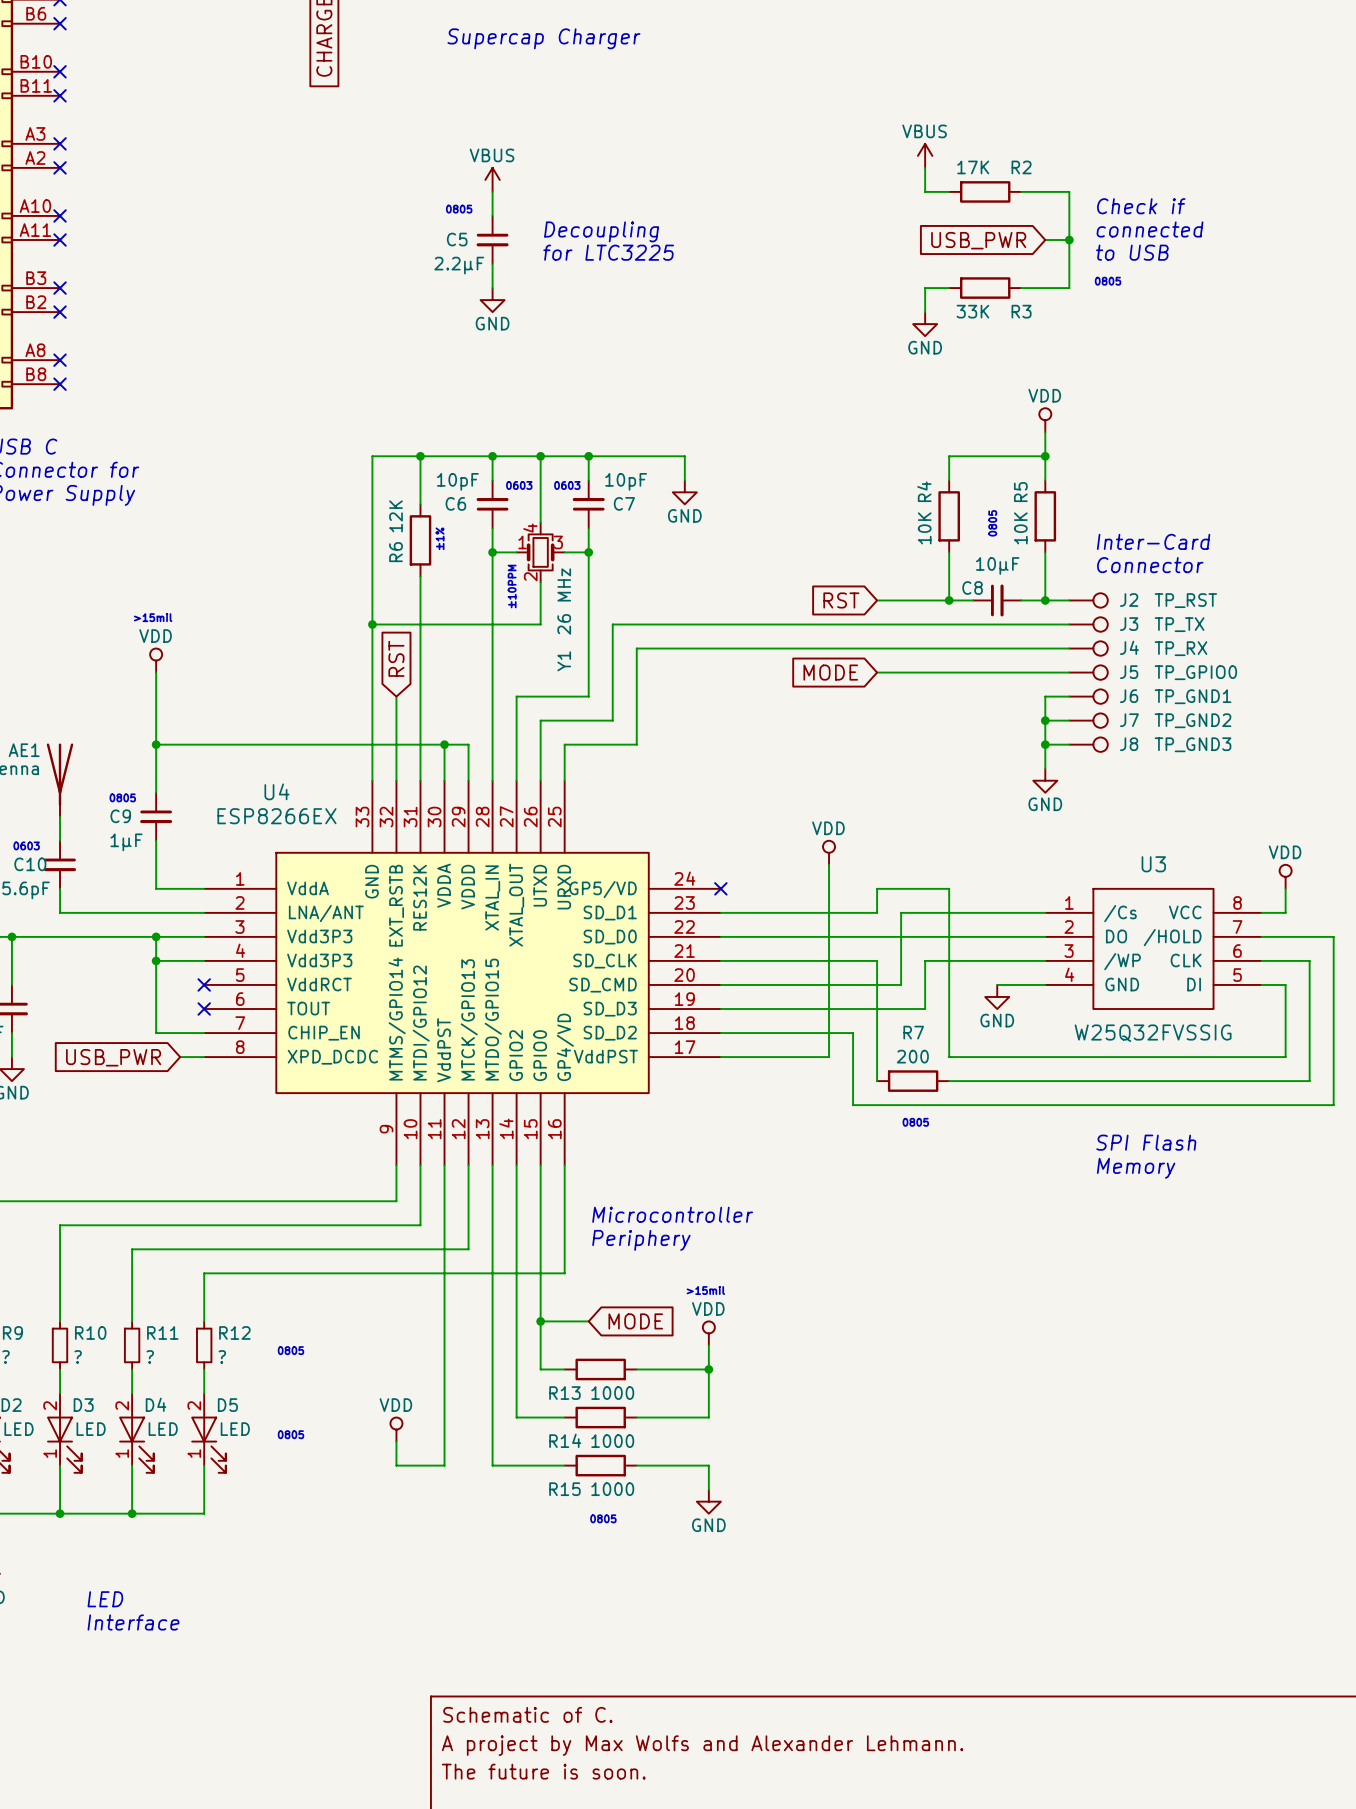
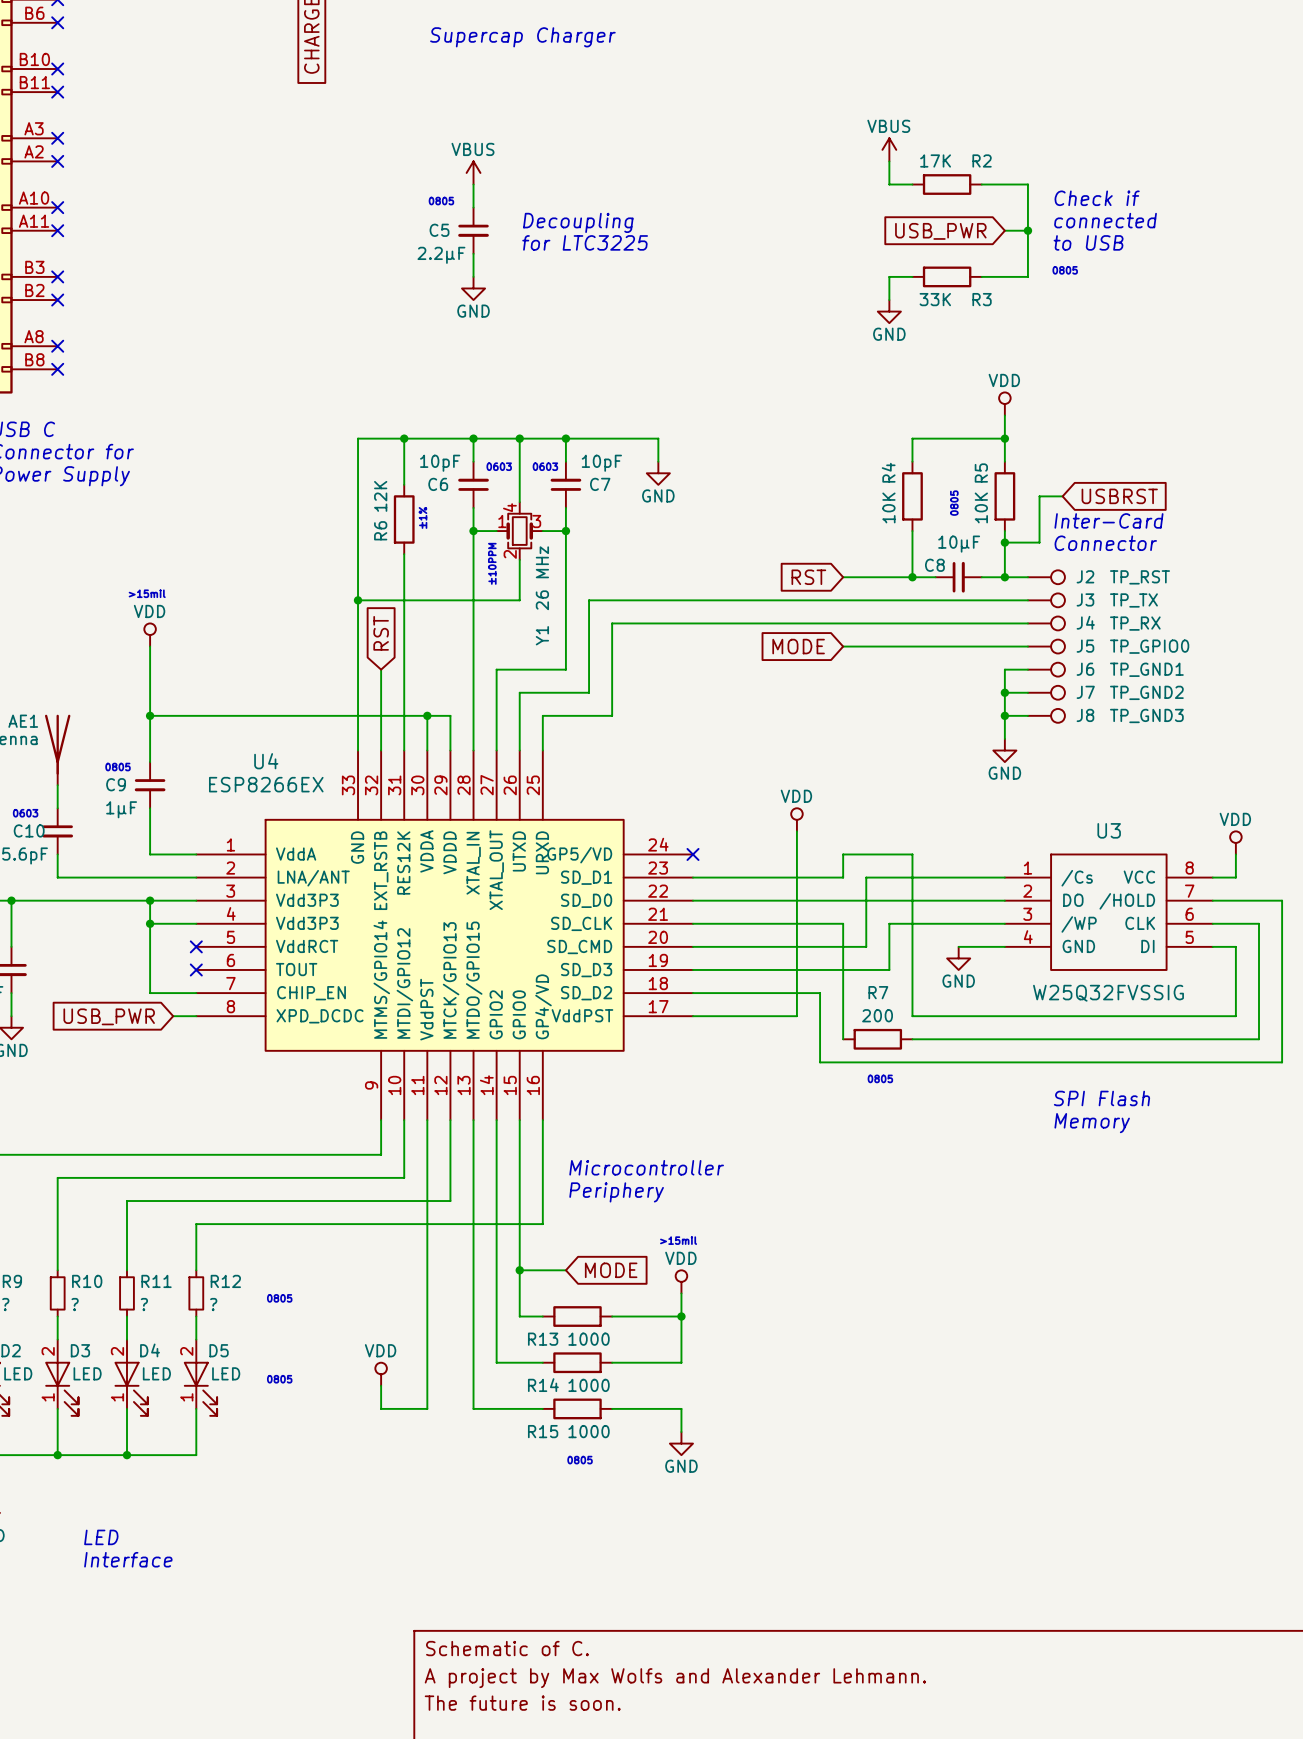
wire: none -> (1062, 496) (1039, 496) (1039, 542) (1004, 542)
global label: none -> USBRST (1119, 496)
junction: none -> (1004, 542)

